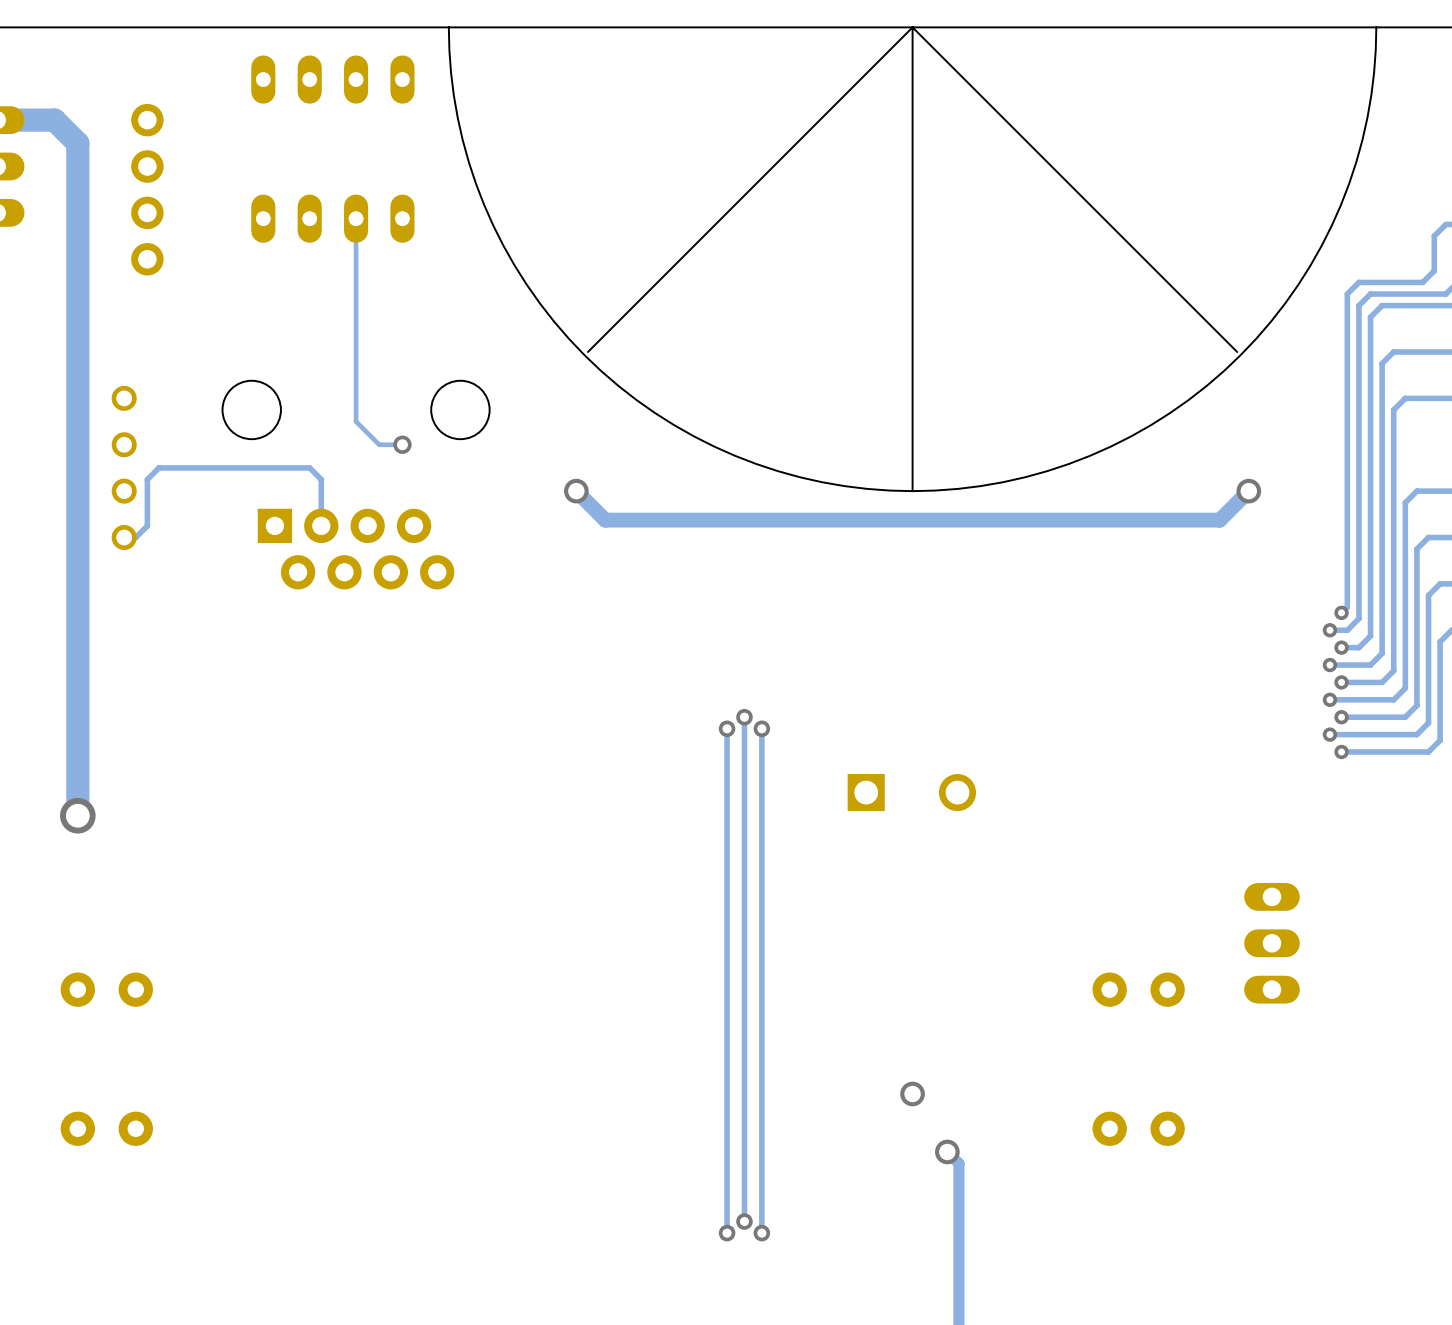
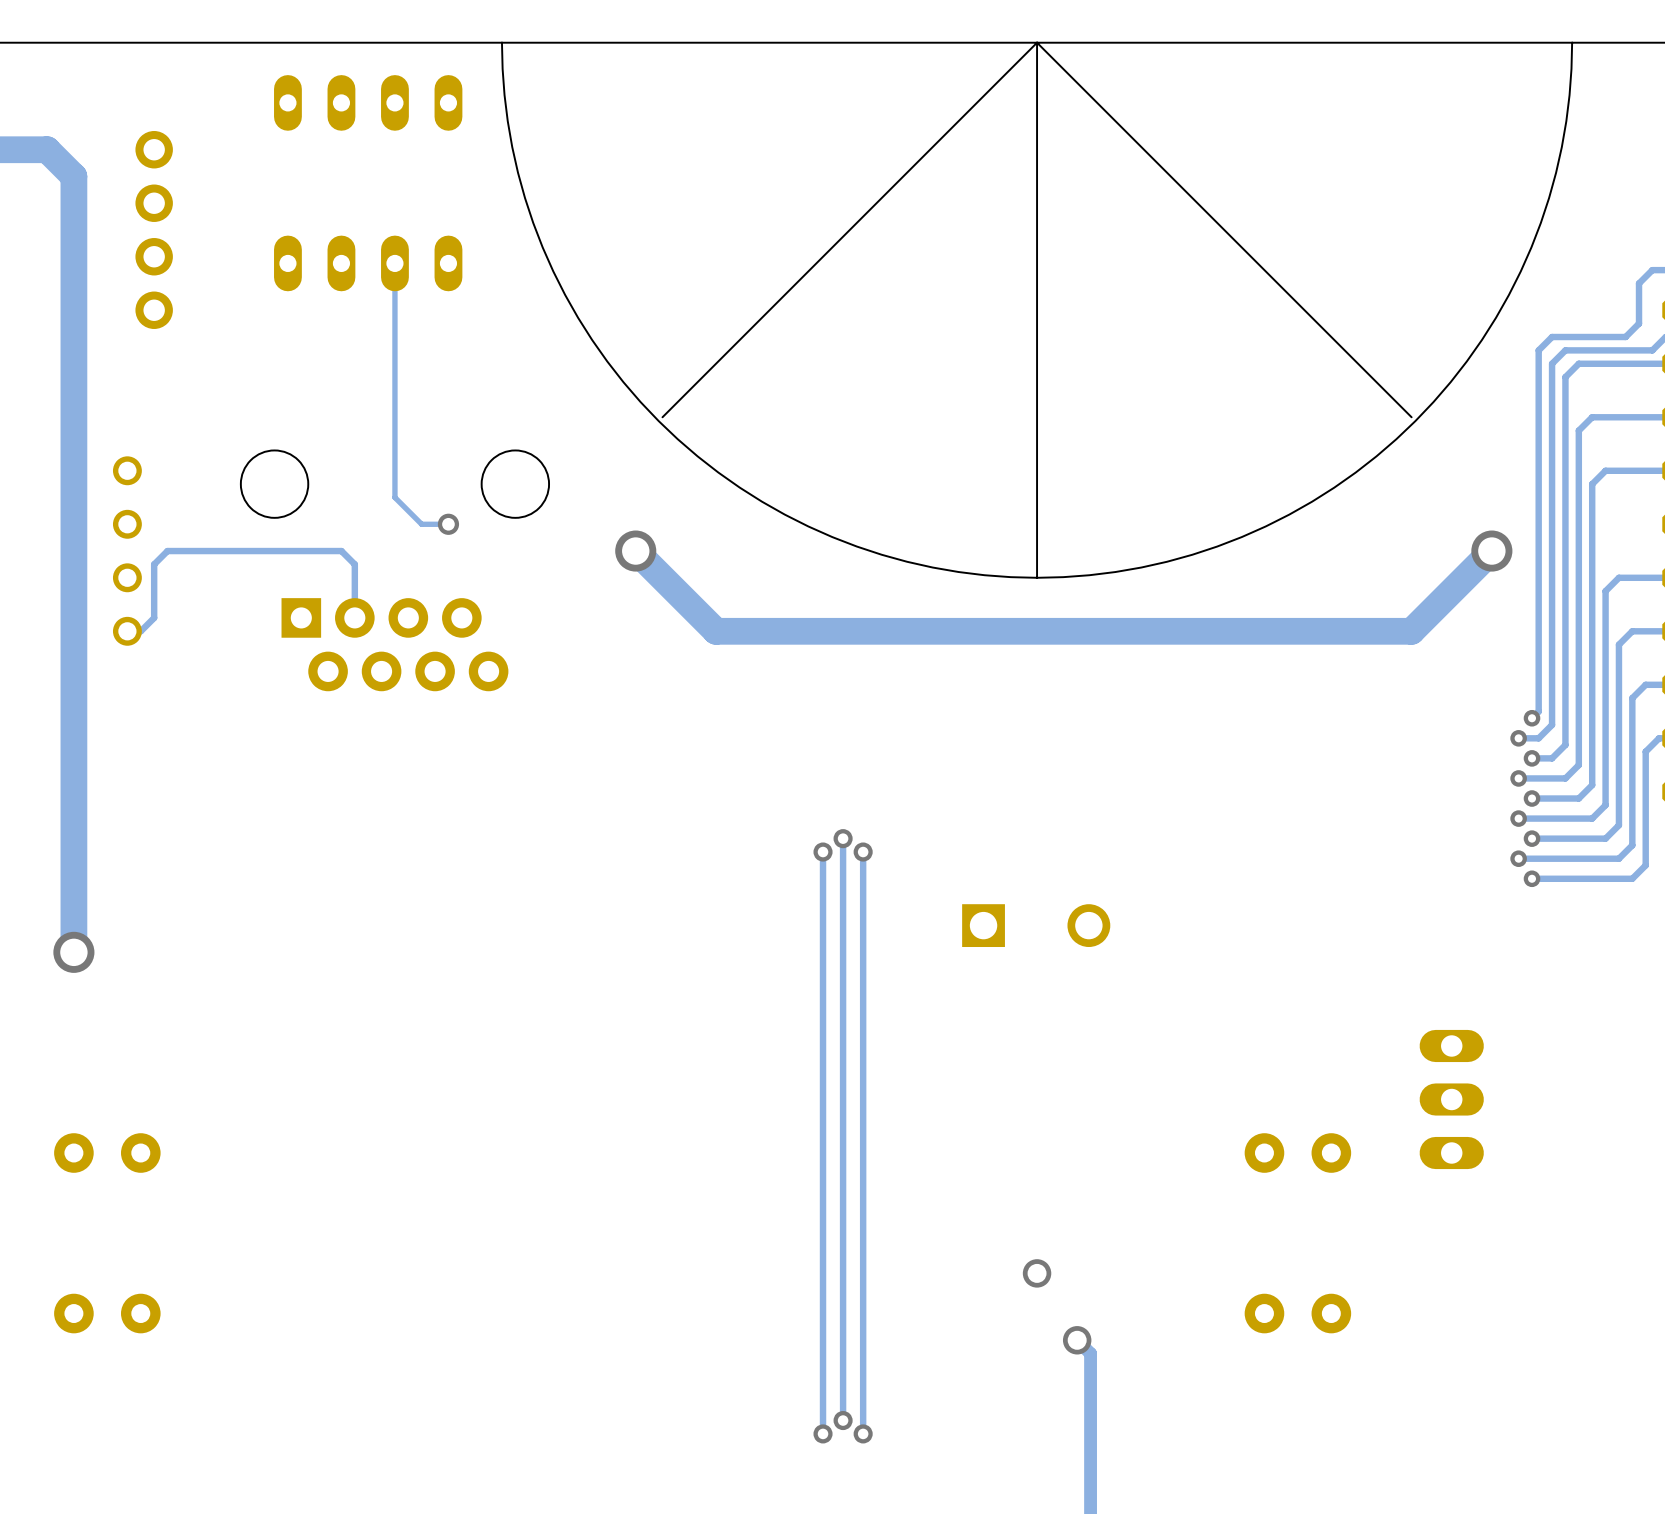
via: none -> (635, 551)
track: none -> (1491, 551) (1411, 631) (716, 631) (635, 551)
via: none -> (1491, 551)
via: (576, 491) -> none
track: (1248, 491) (1219, 520) (605, 520) (576, 491) -> none
via: (1248, 491) -> none

